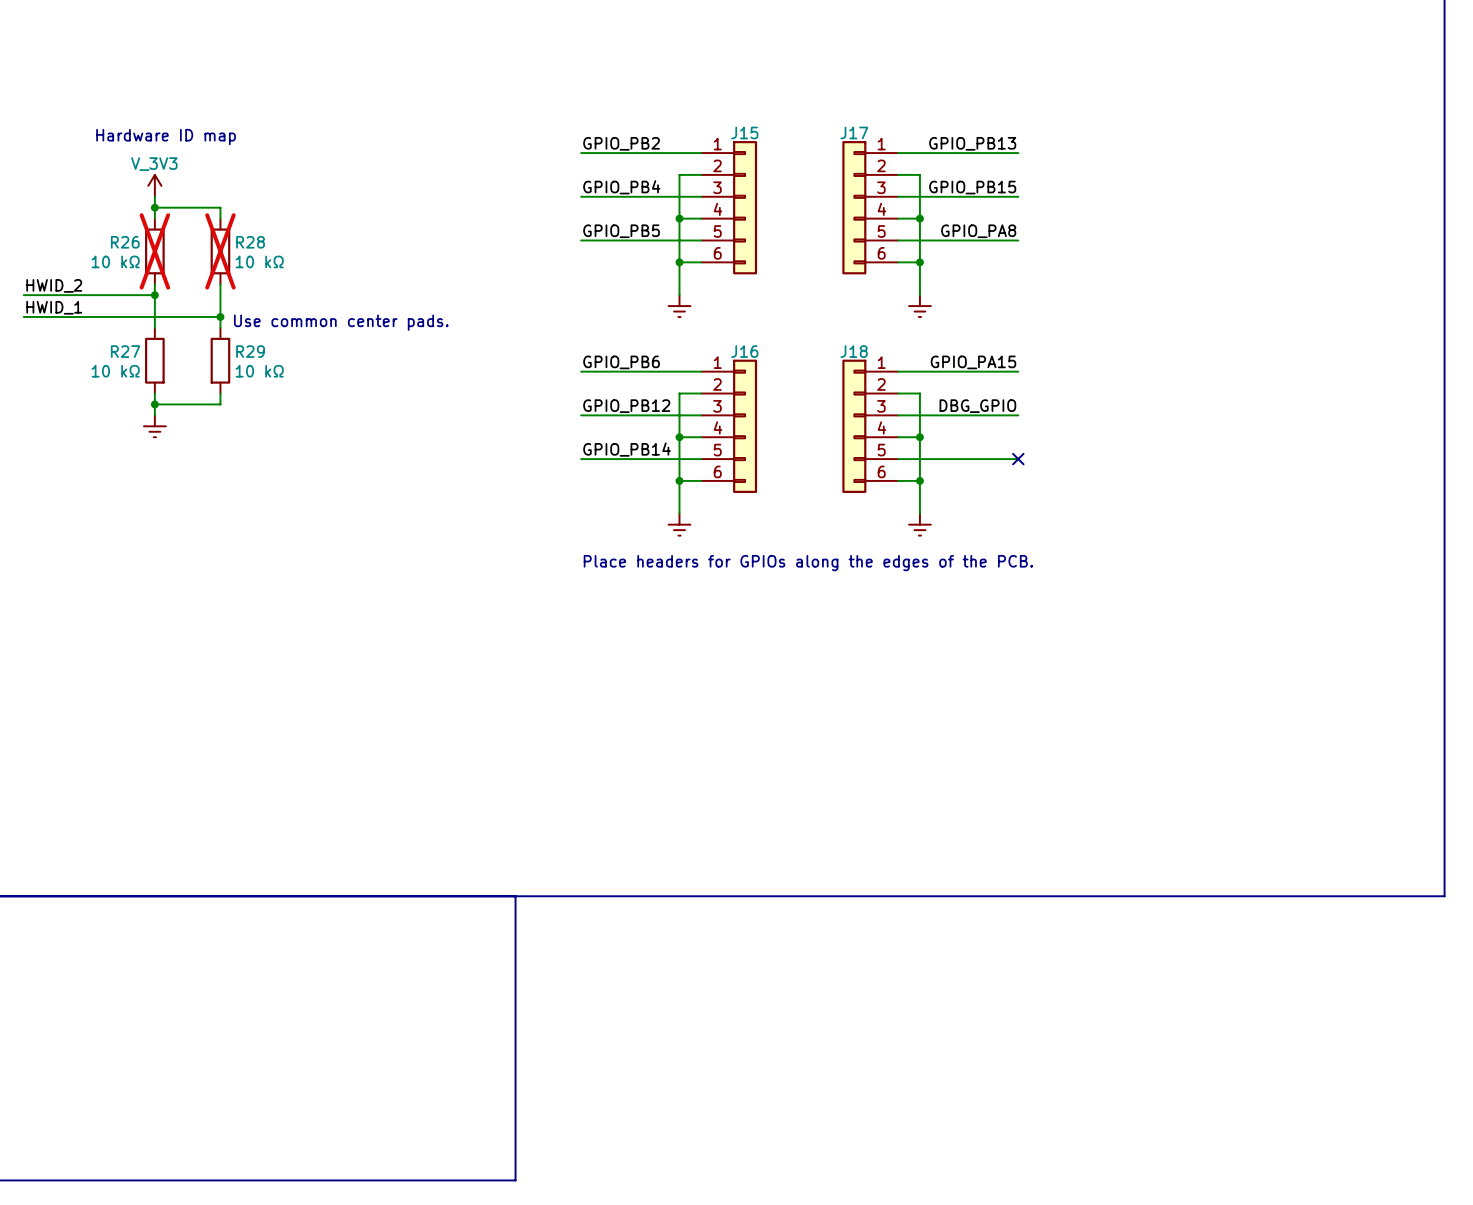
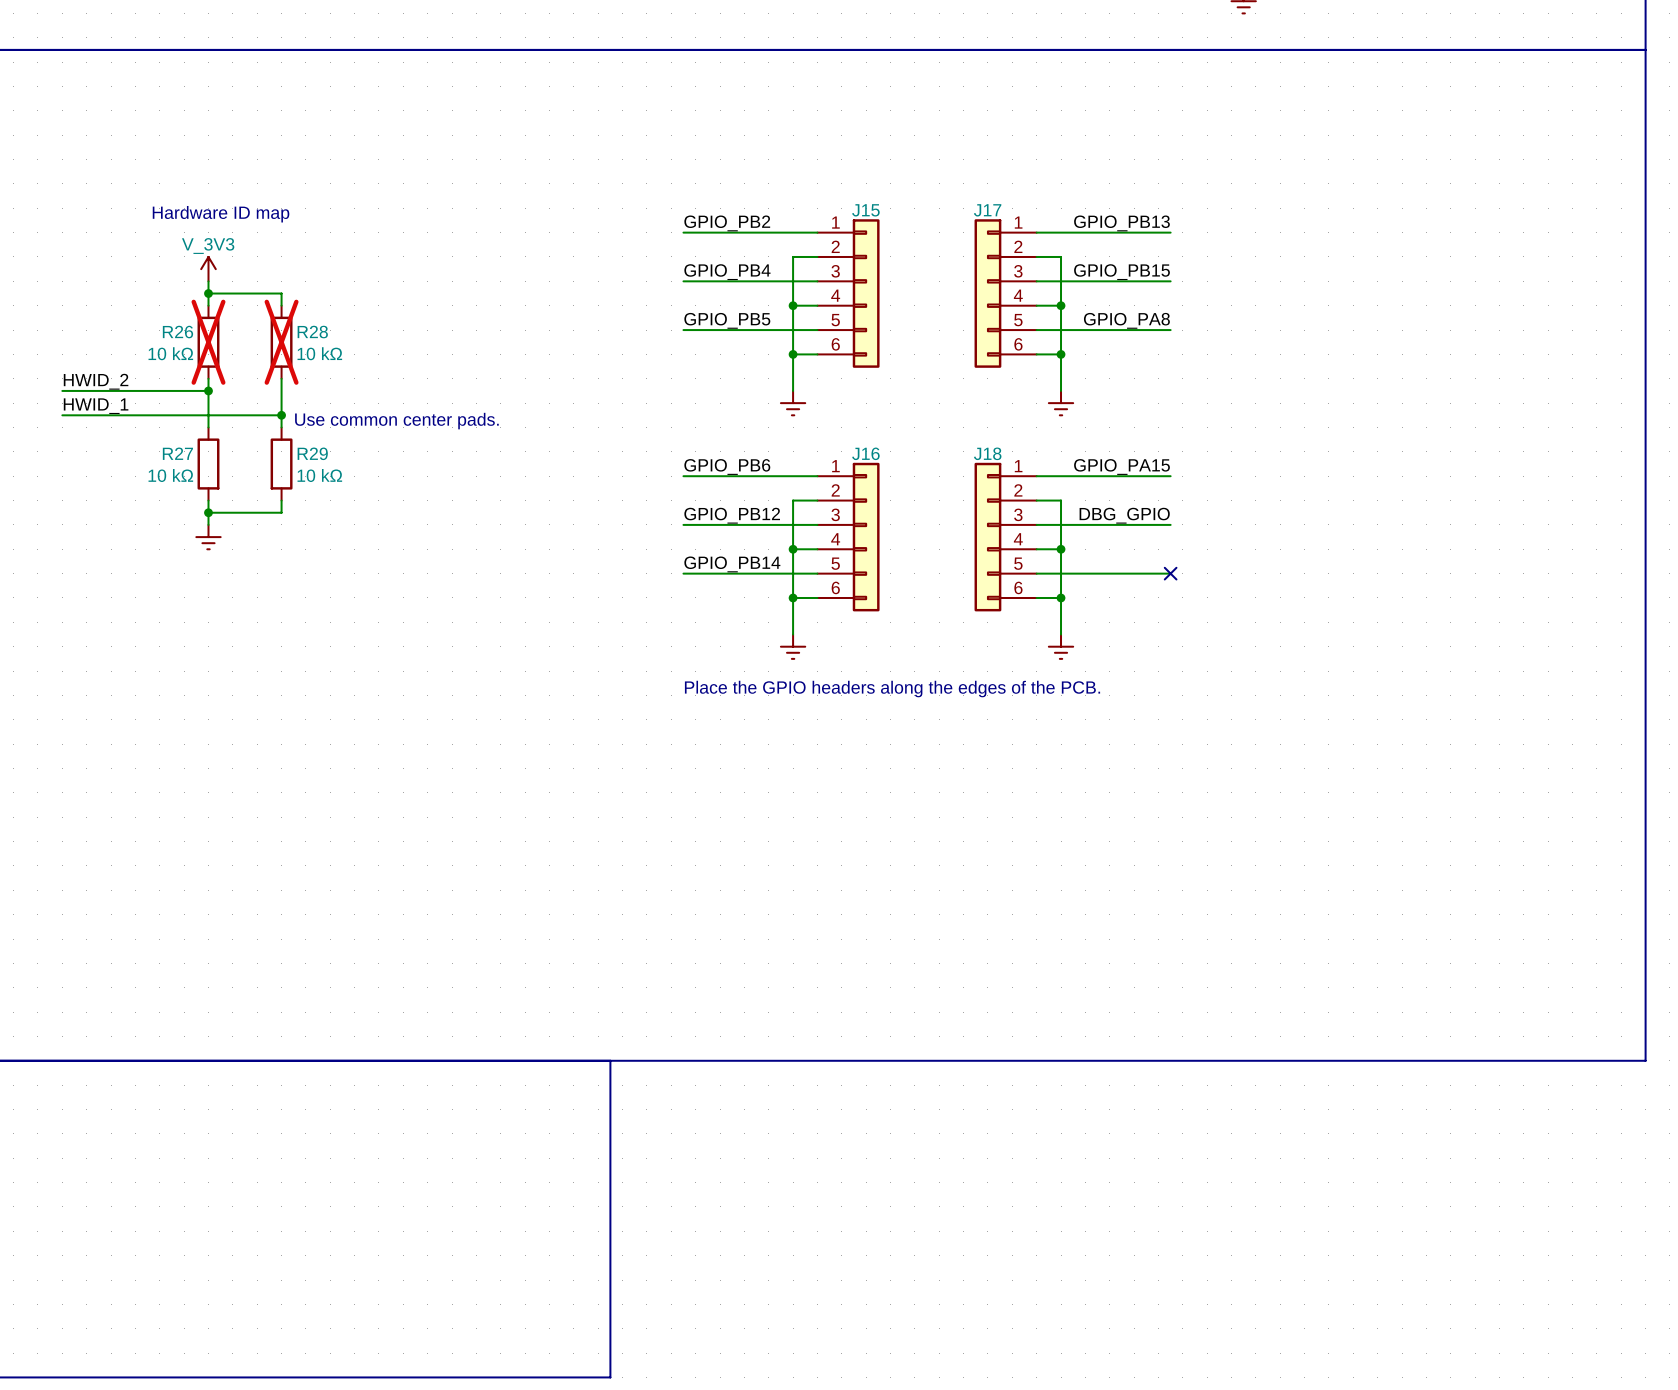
text: Place headers for GPIOs along the edges of the PCB. (808, 563) -> Place the GPIO headers along the edges of the PCB. (892, 689)

